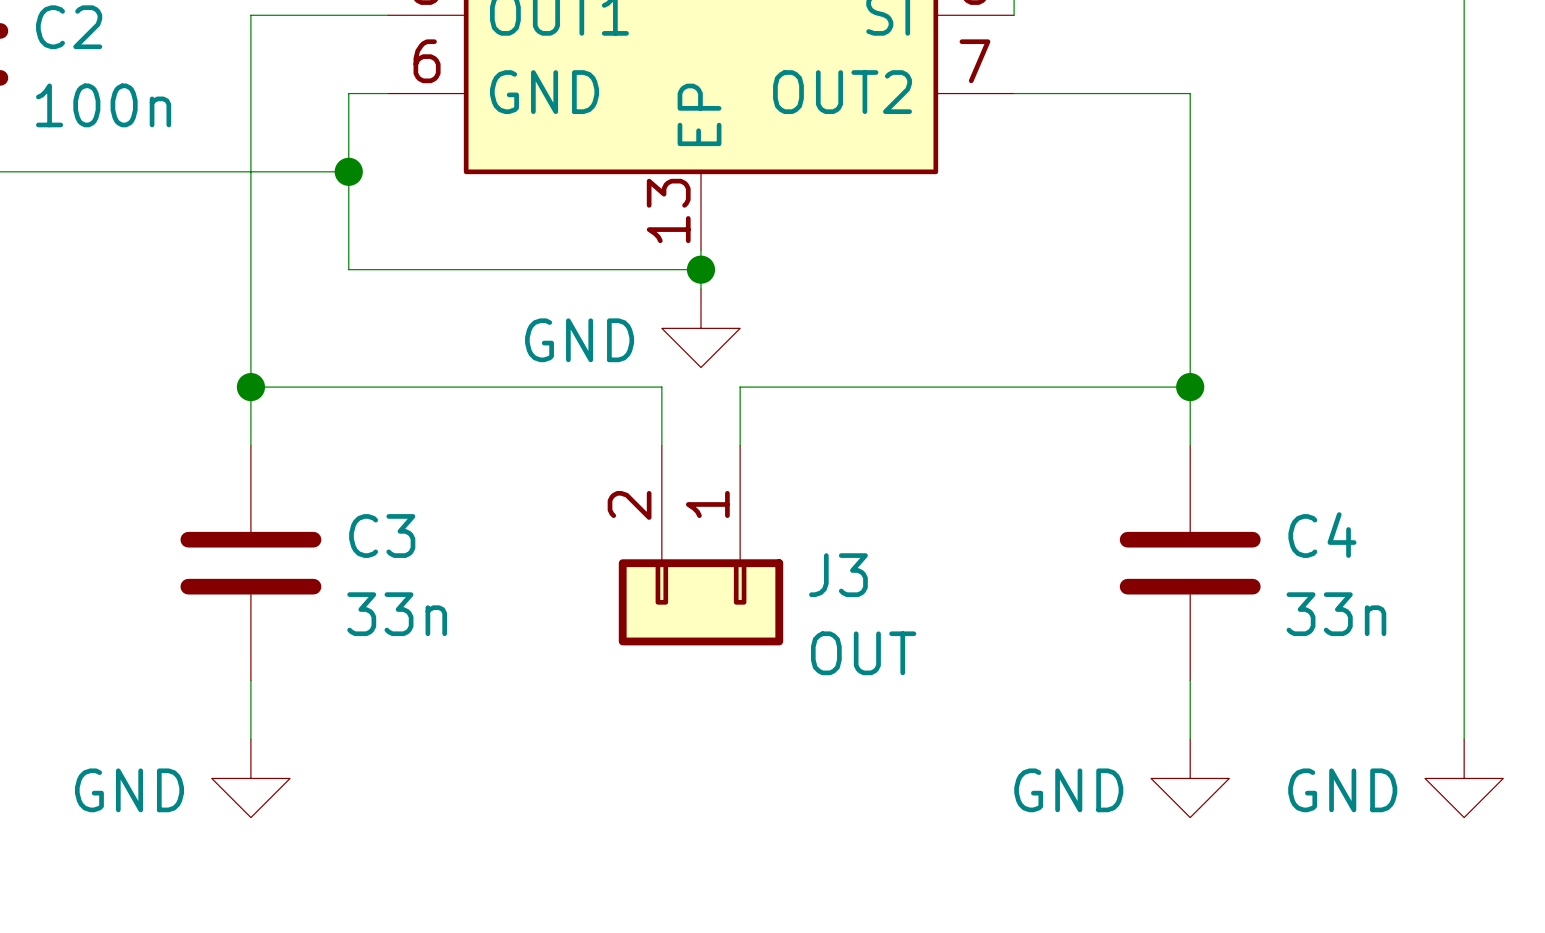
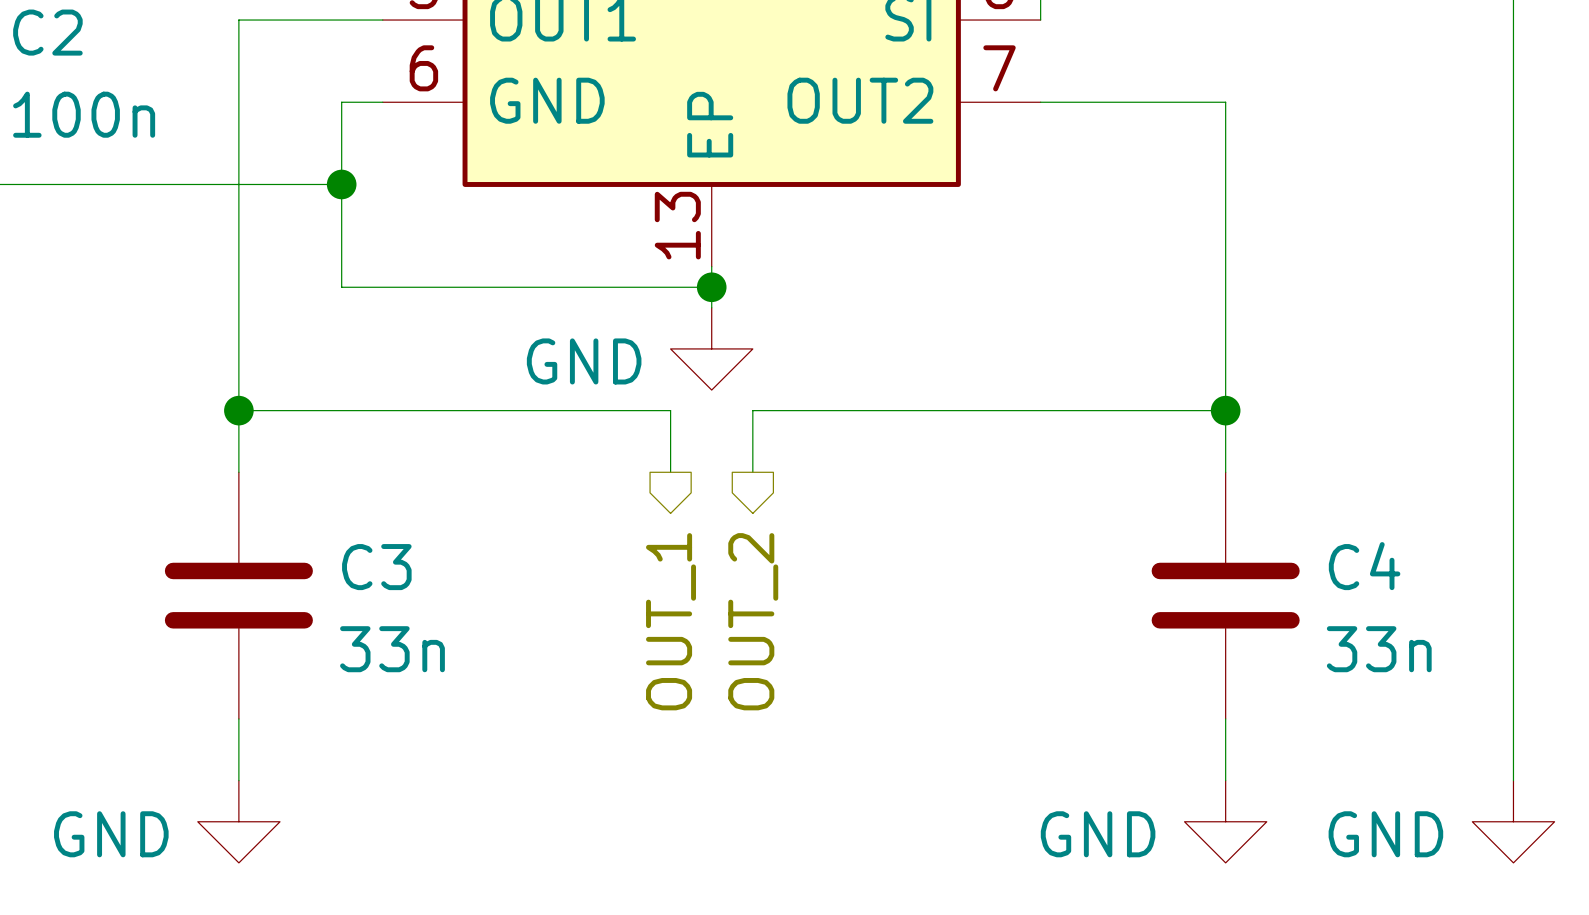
J3: OUT (700, 545) -> none
hierarchical label: none -> OUT_1 (671, 621)
hierarchical label: none -> OUT_2 (753, 621)

